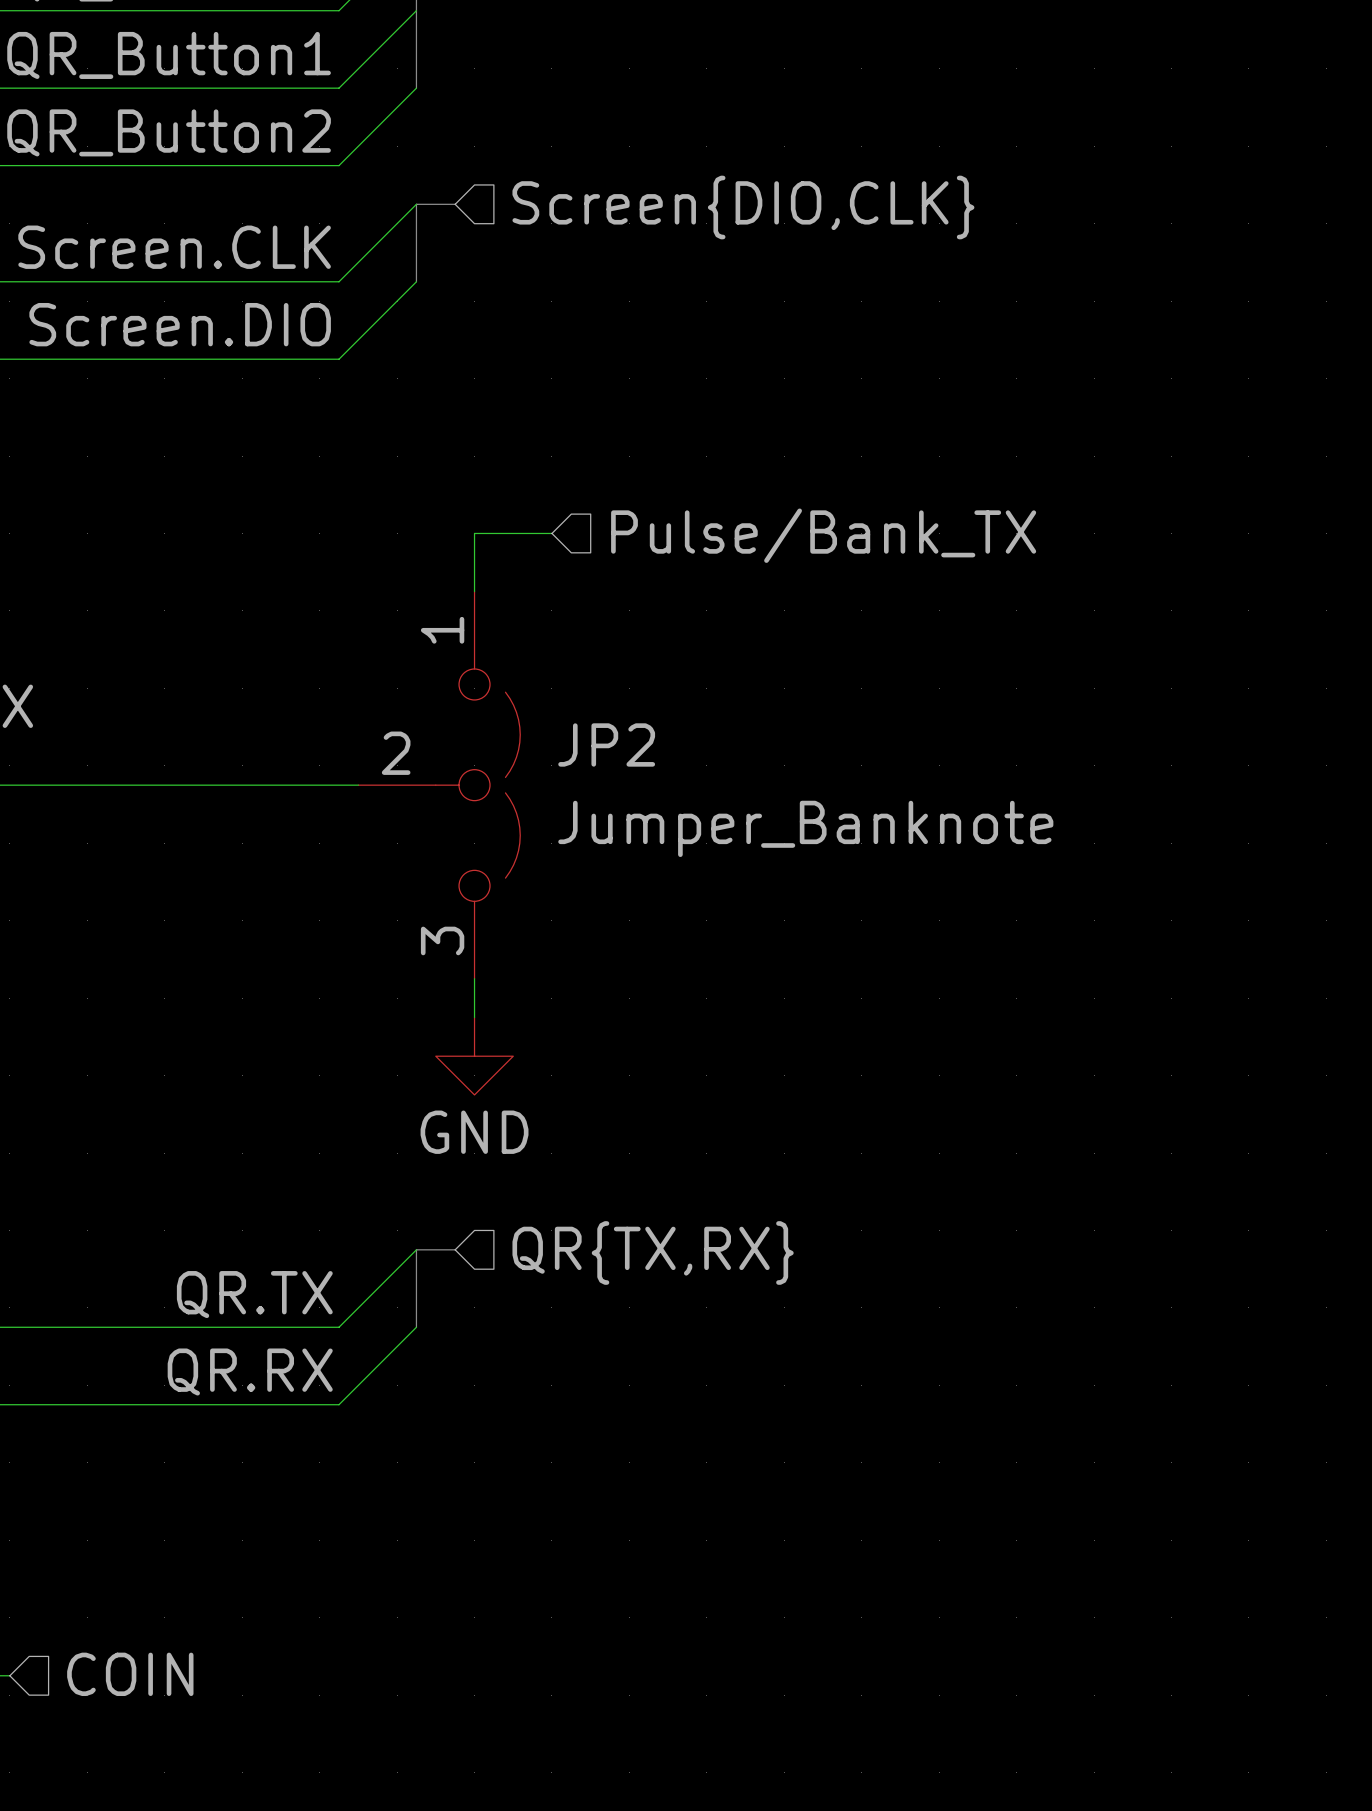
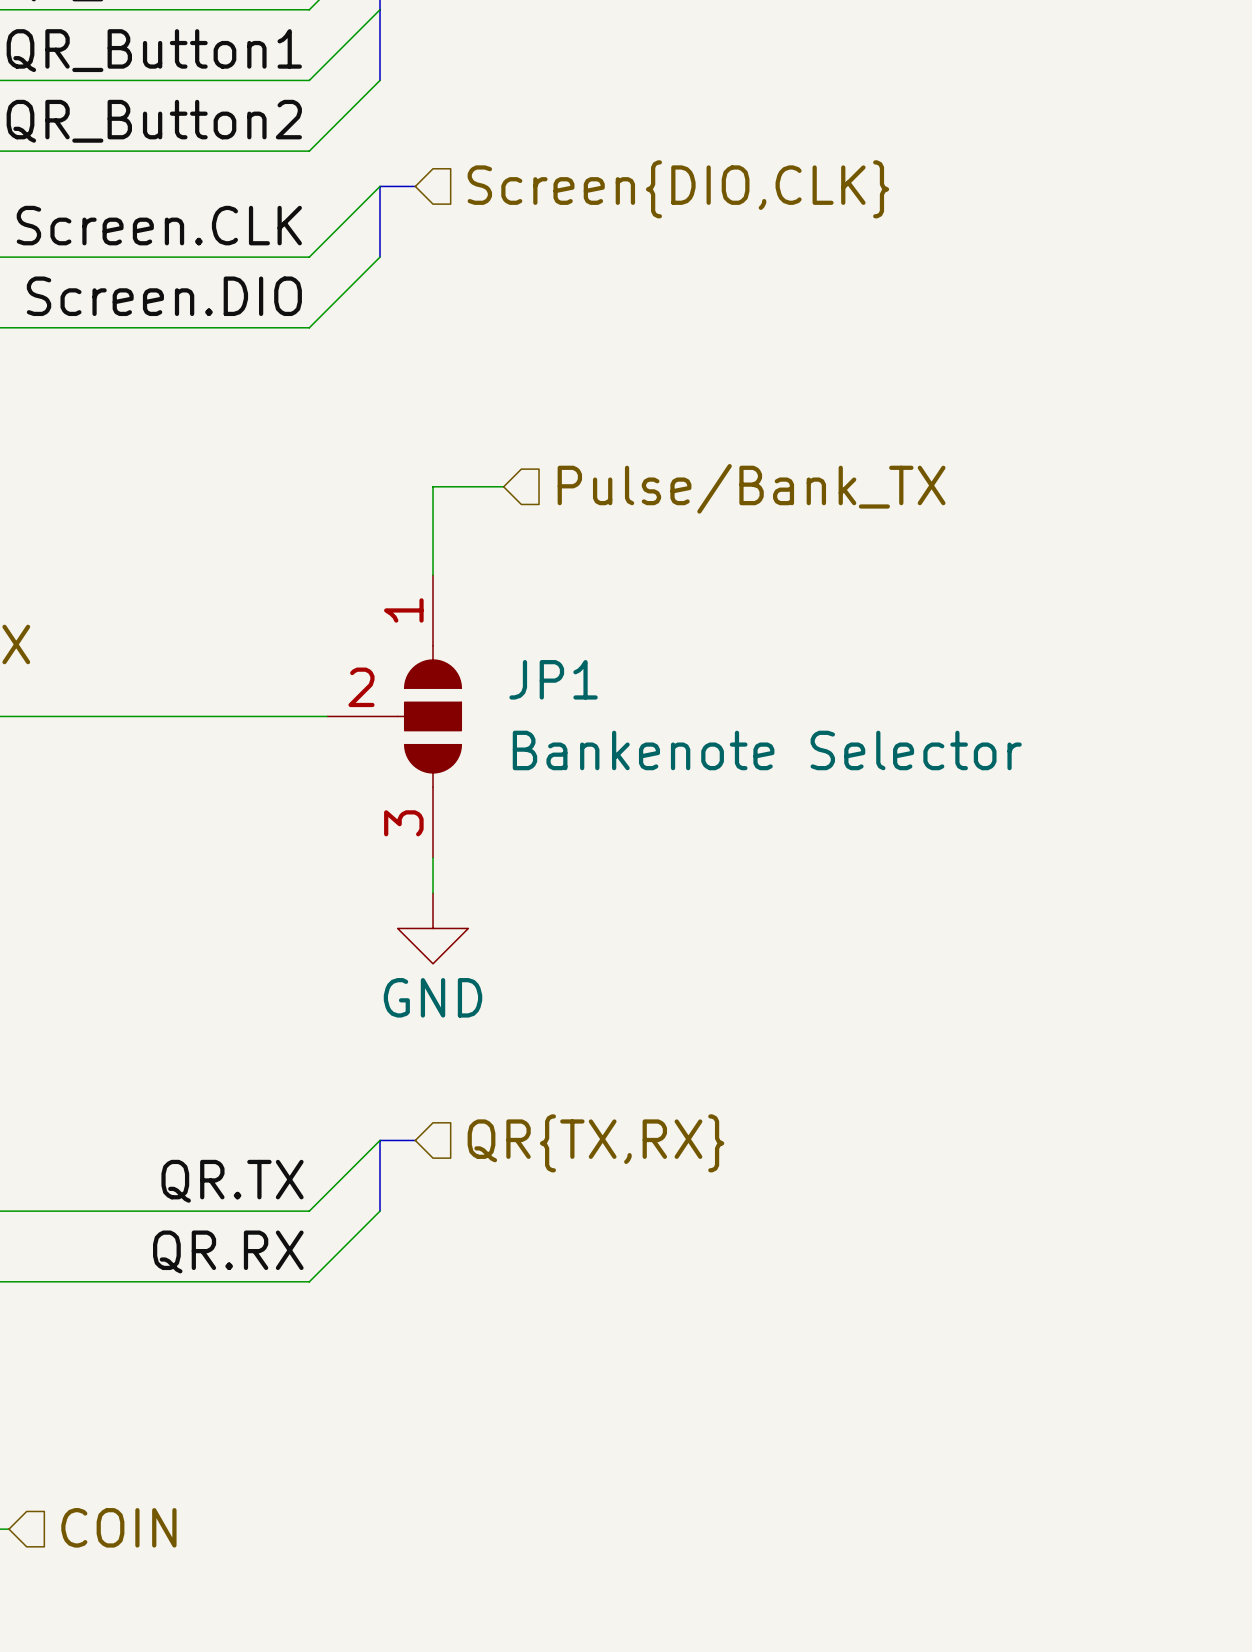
JP1: none -> Bankenote Selector (394, 716)
JP2: Jumper_Banknote (439, 785) -> none
power symbol position: GND (474, 1056) -> GND (433, 928)

